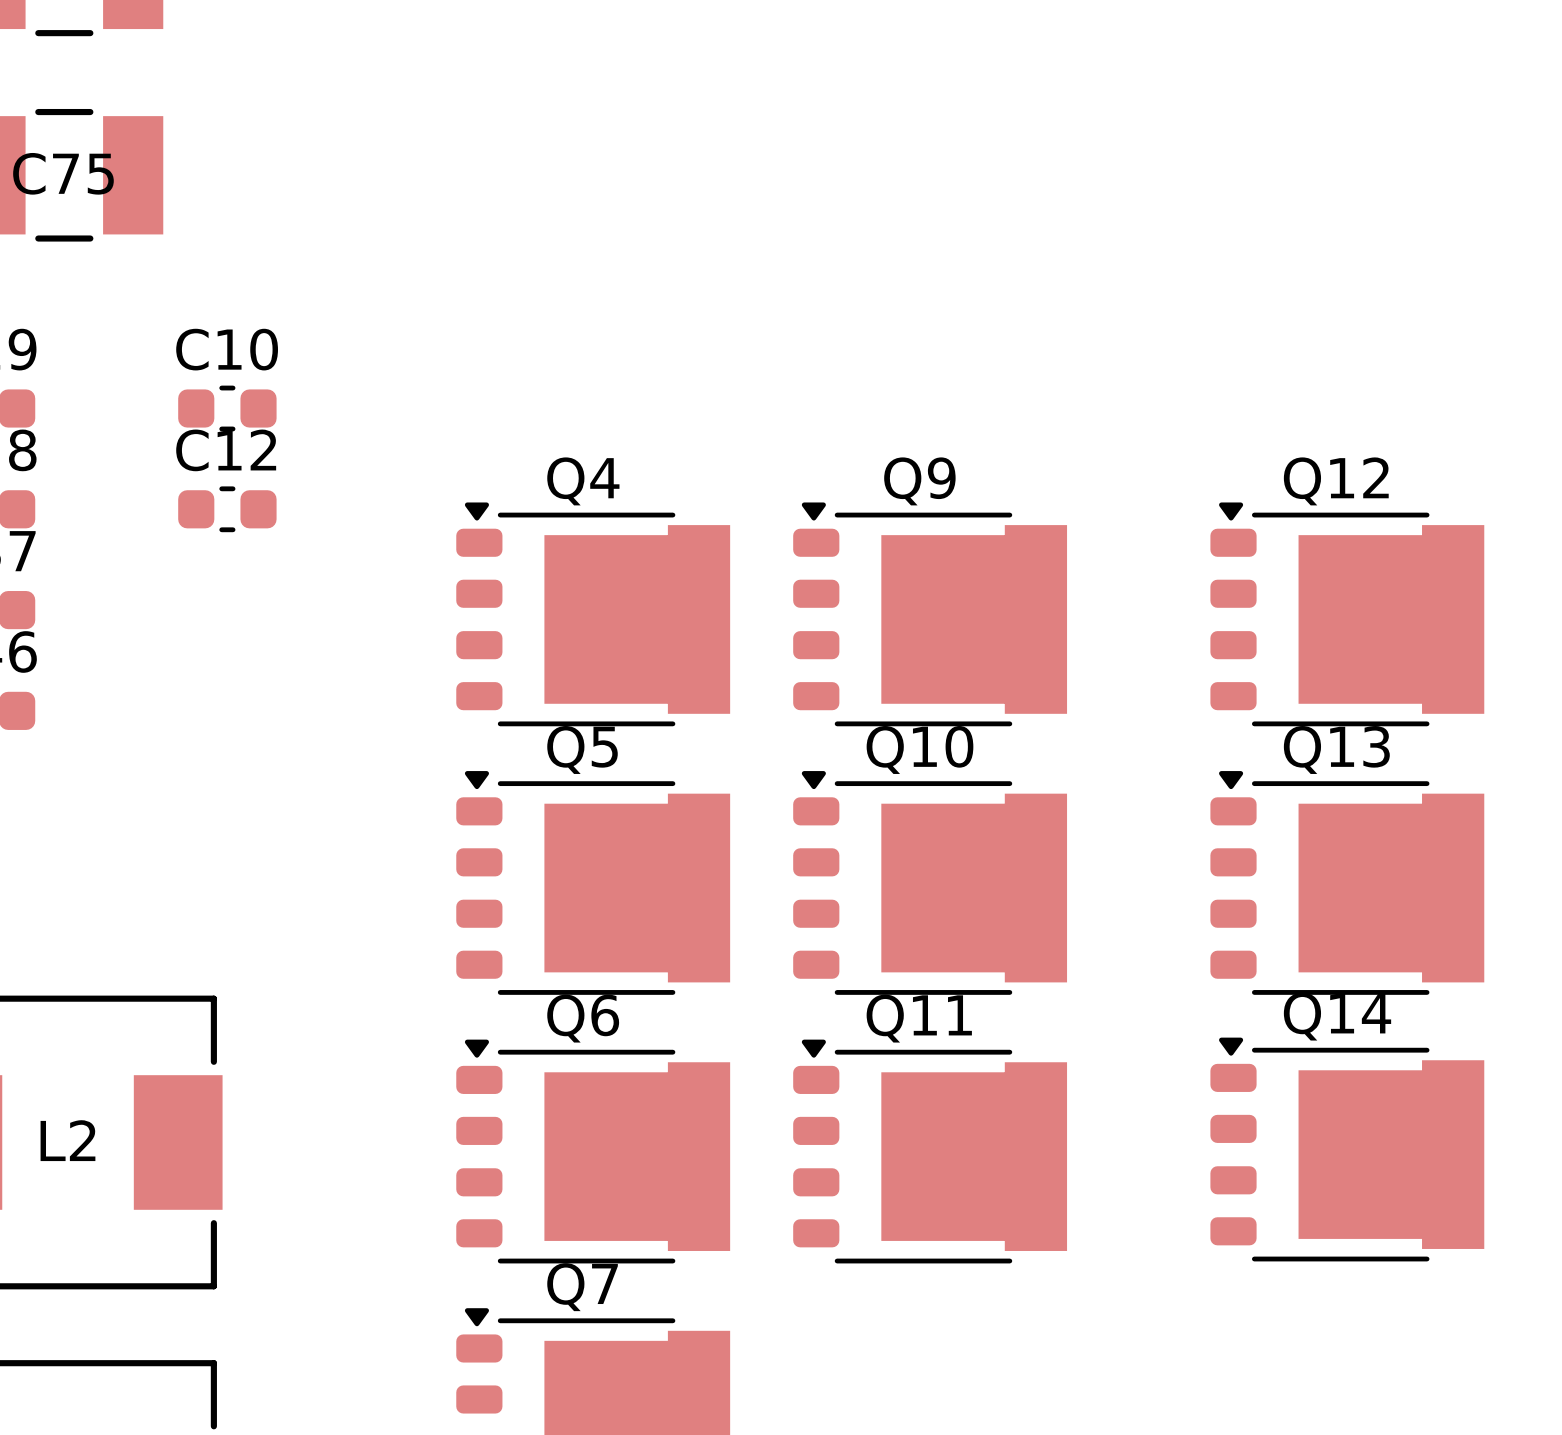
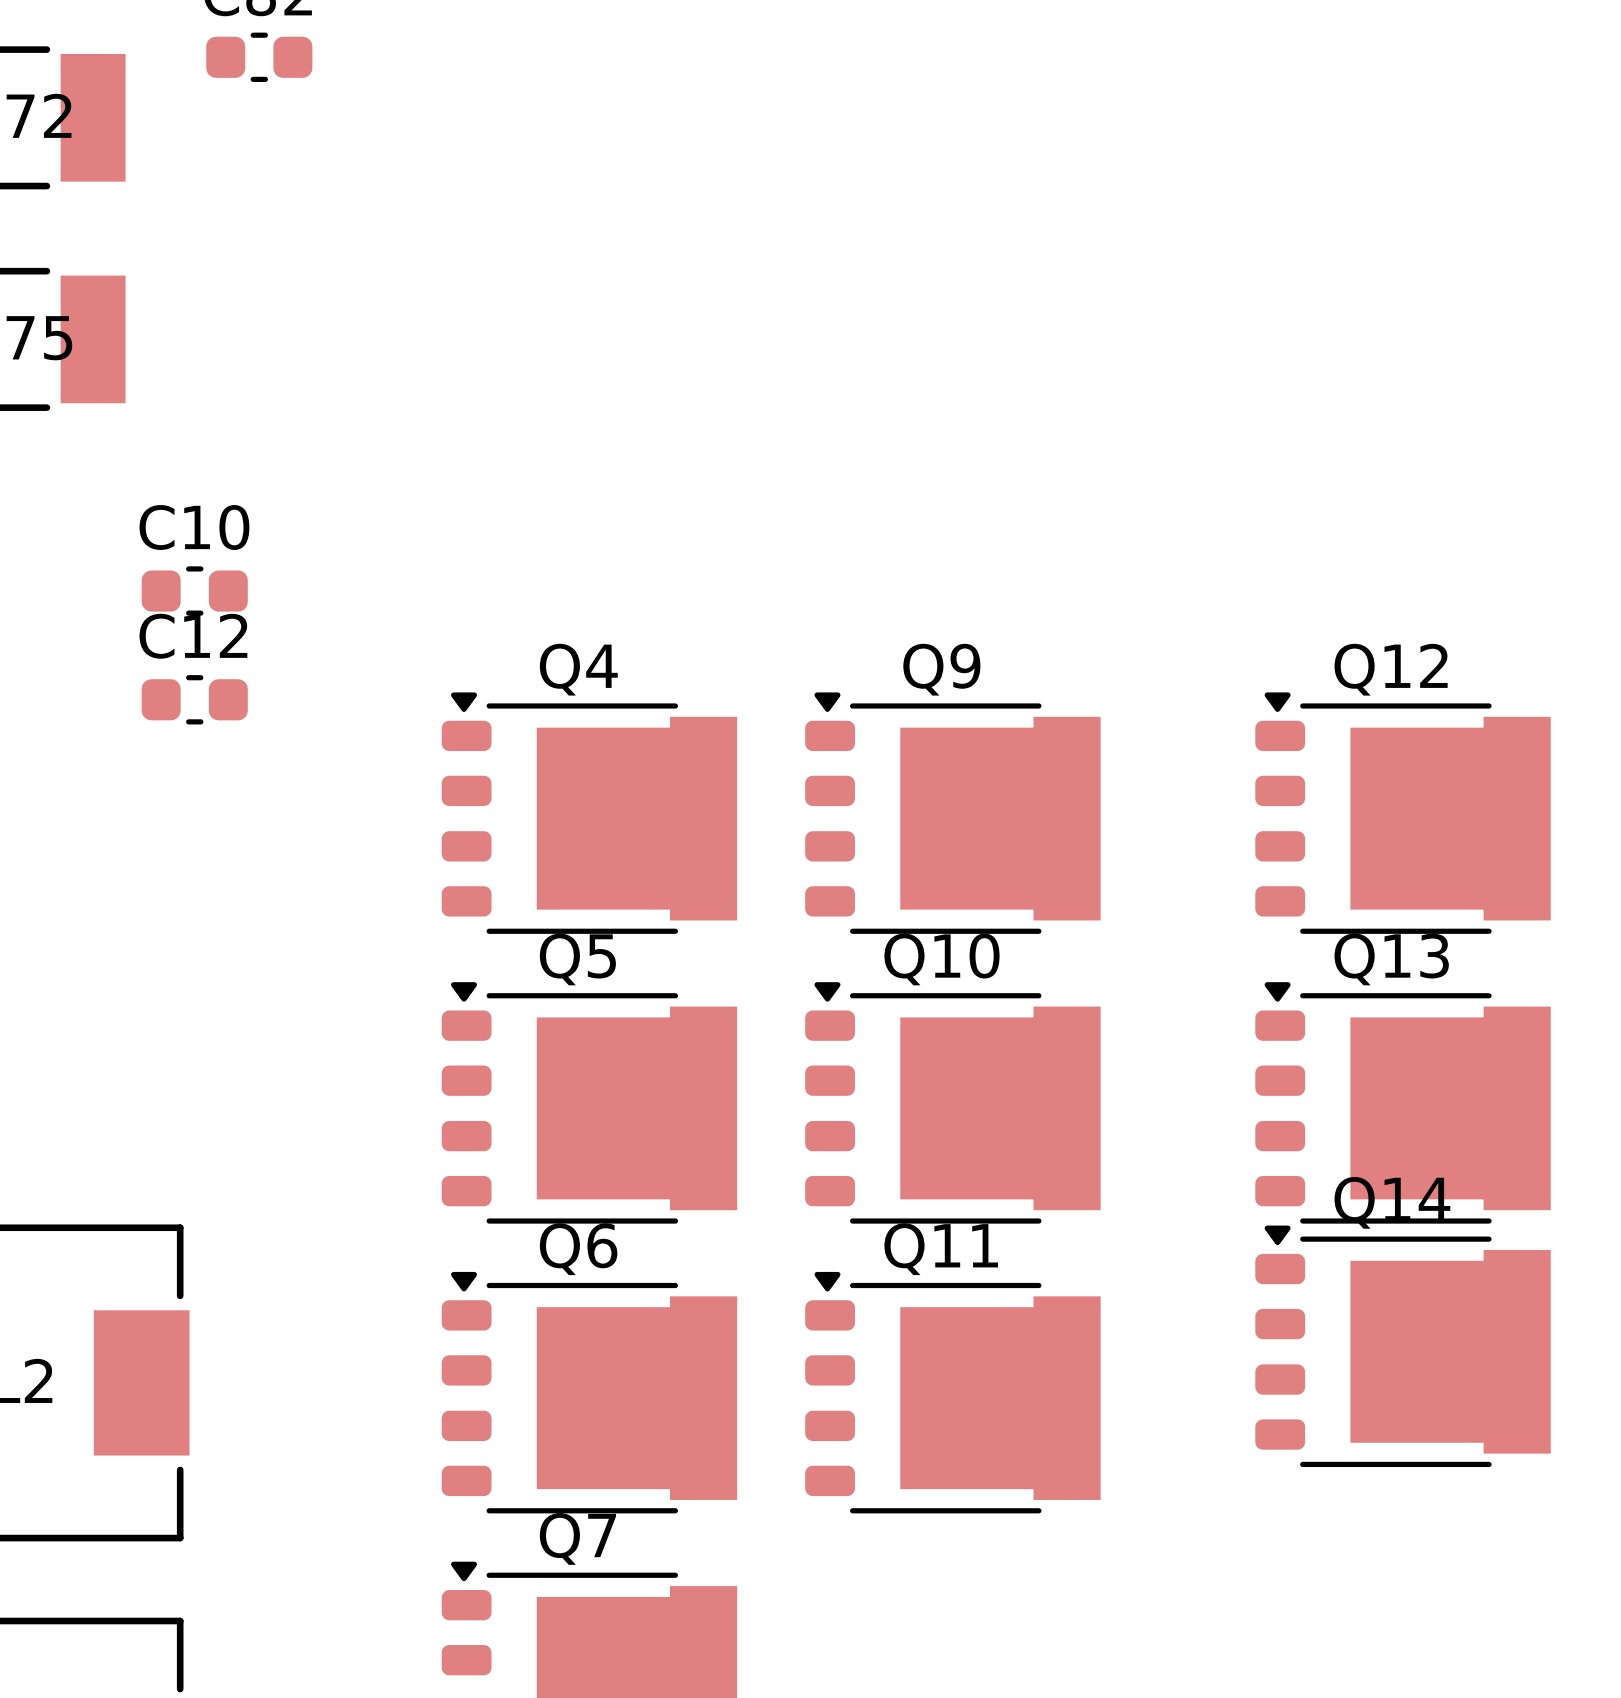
Q14 position: (1347, 1149) -> (1403, 1346)

